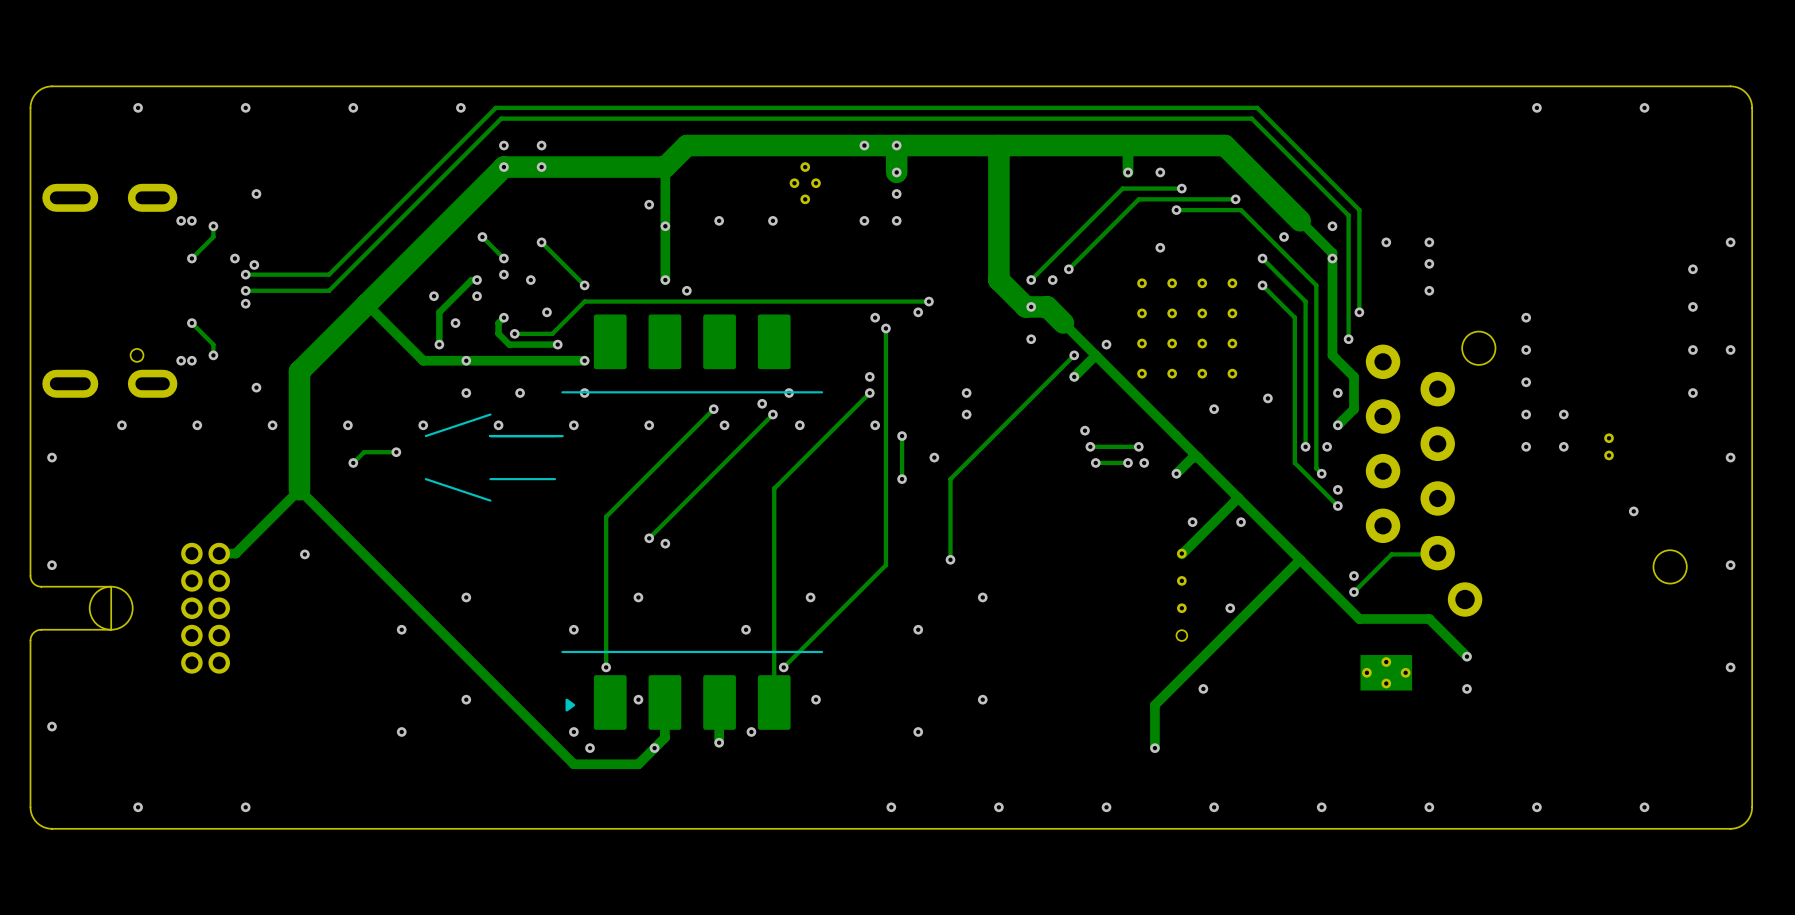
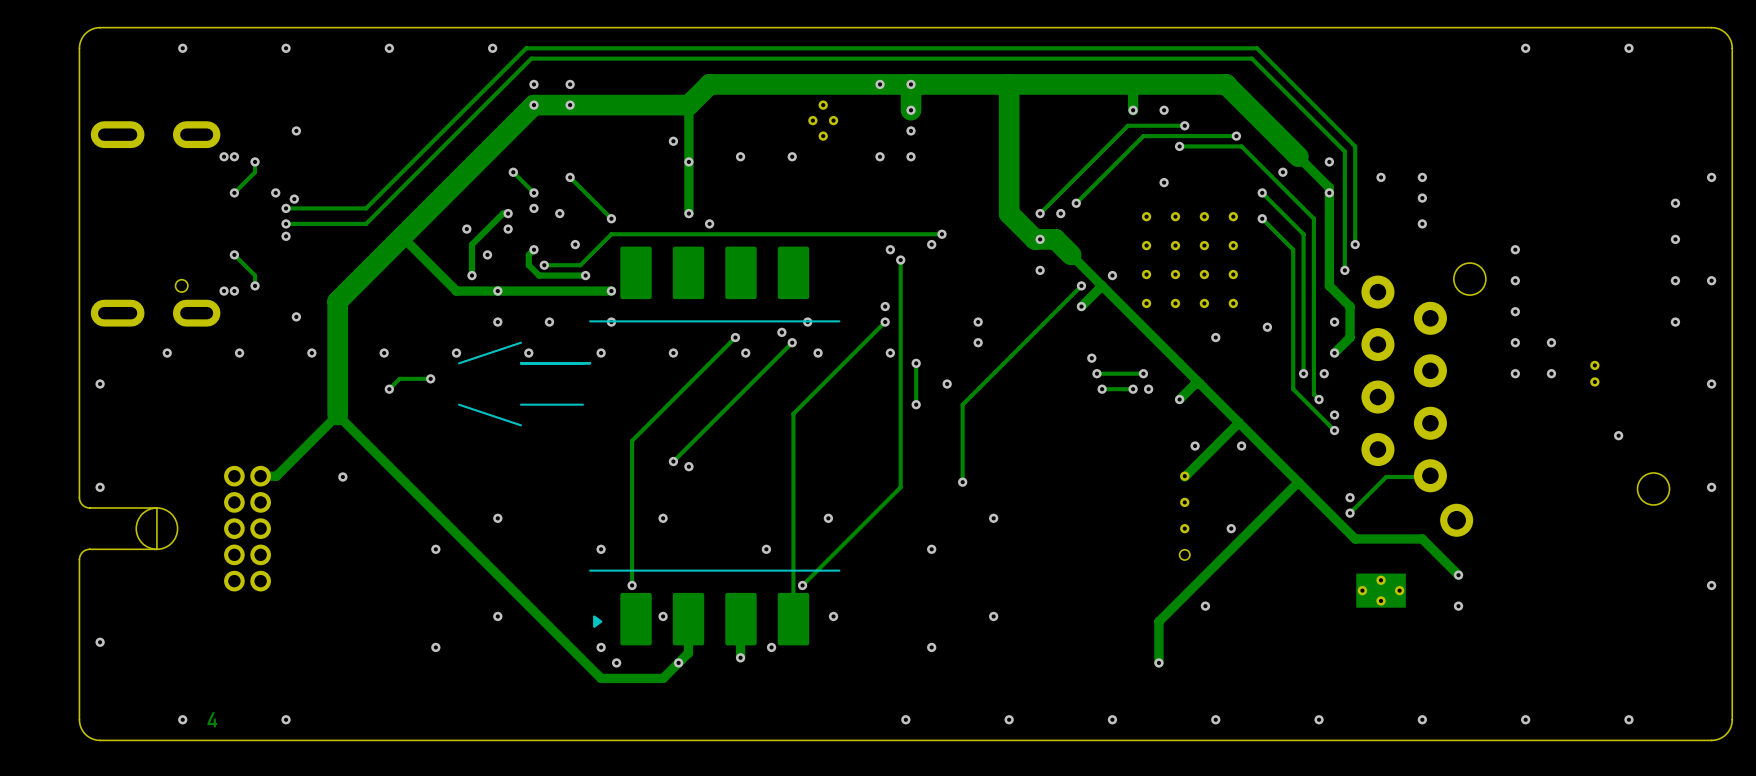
drawing: none -> [207, 712, 218, 728]

